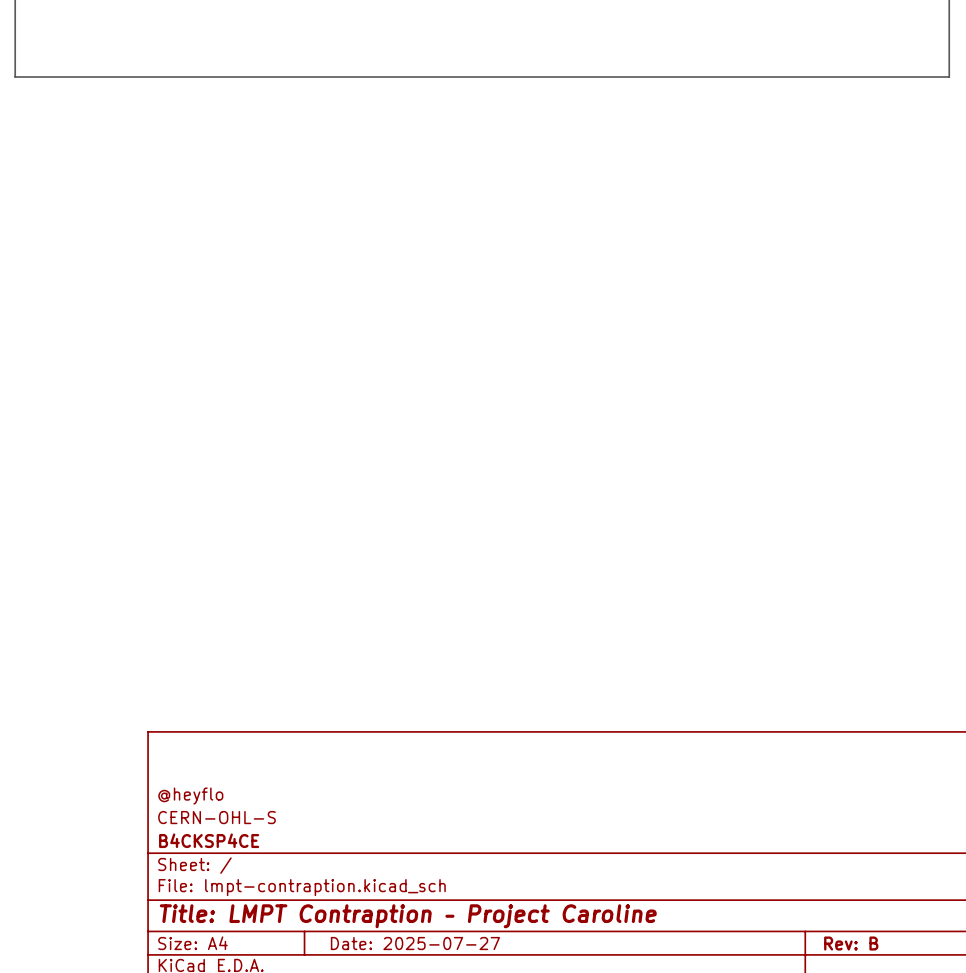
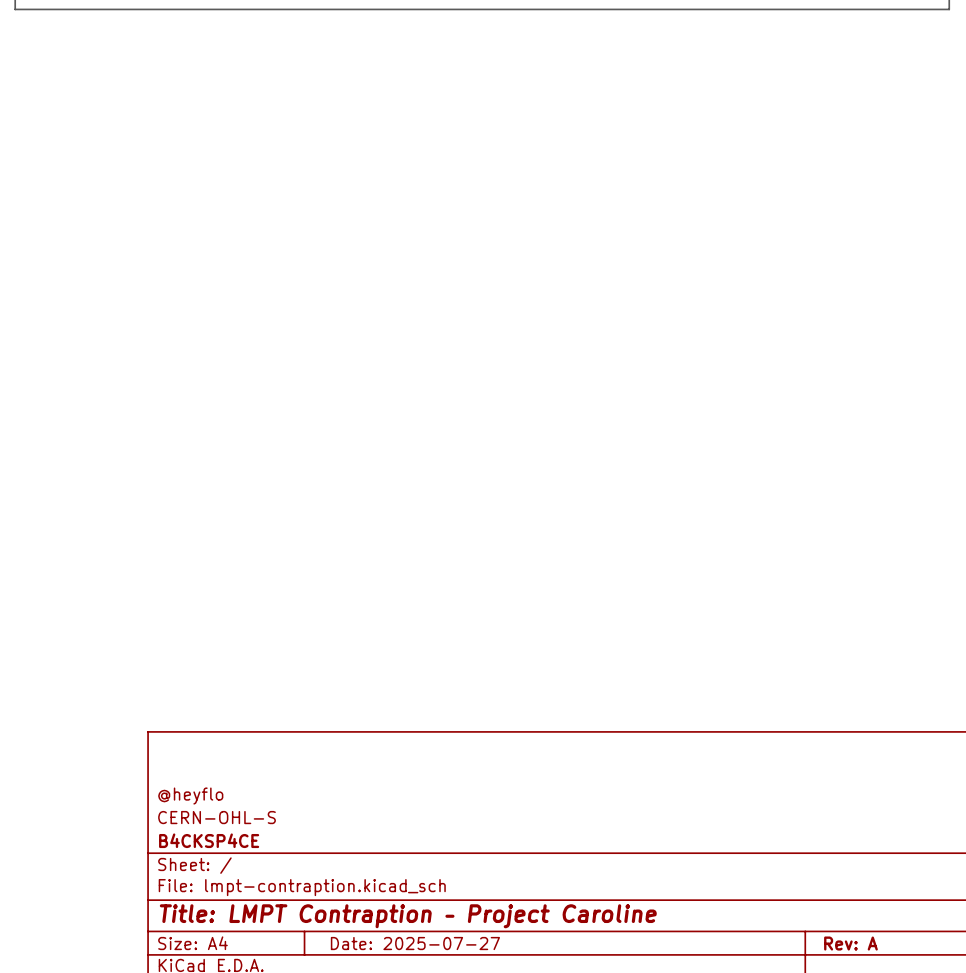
line: (15, 9) (15, 77) (949, 77) (949, 9) -> (15, 9) (949, 9)
title block: Rev: B (851, 943) -> Rev: A (850, 943)

